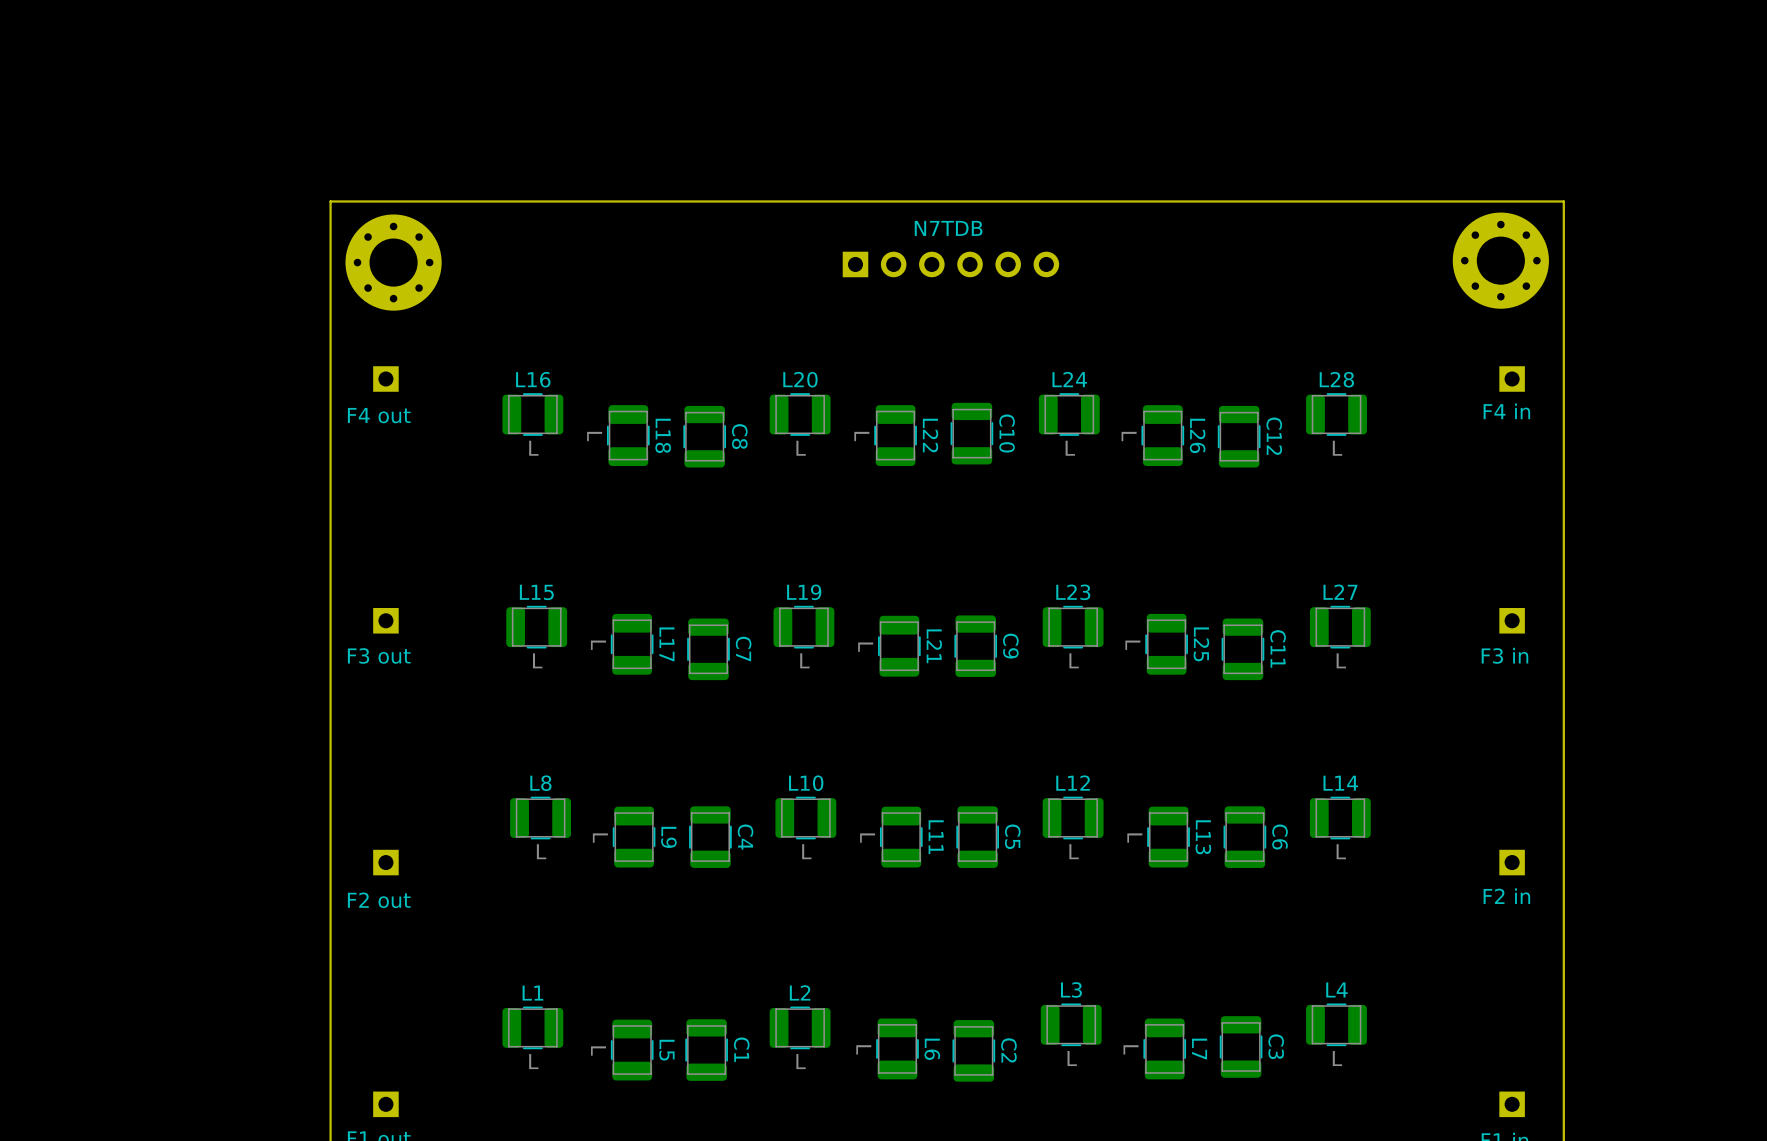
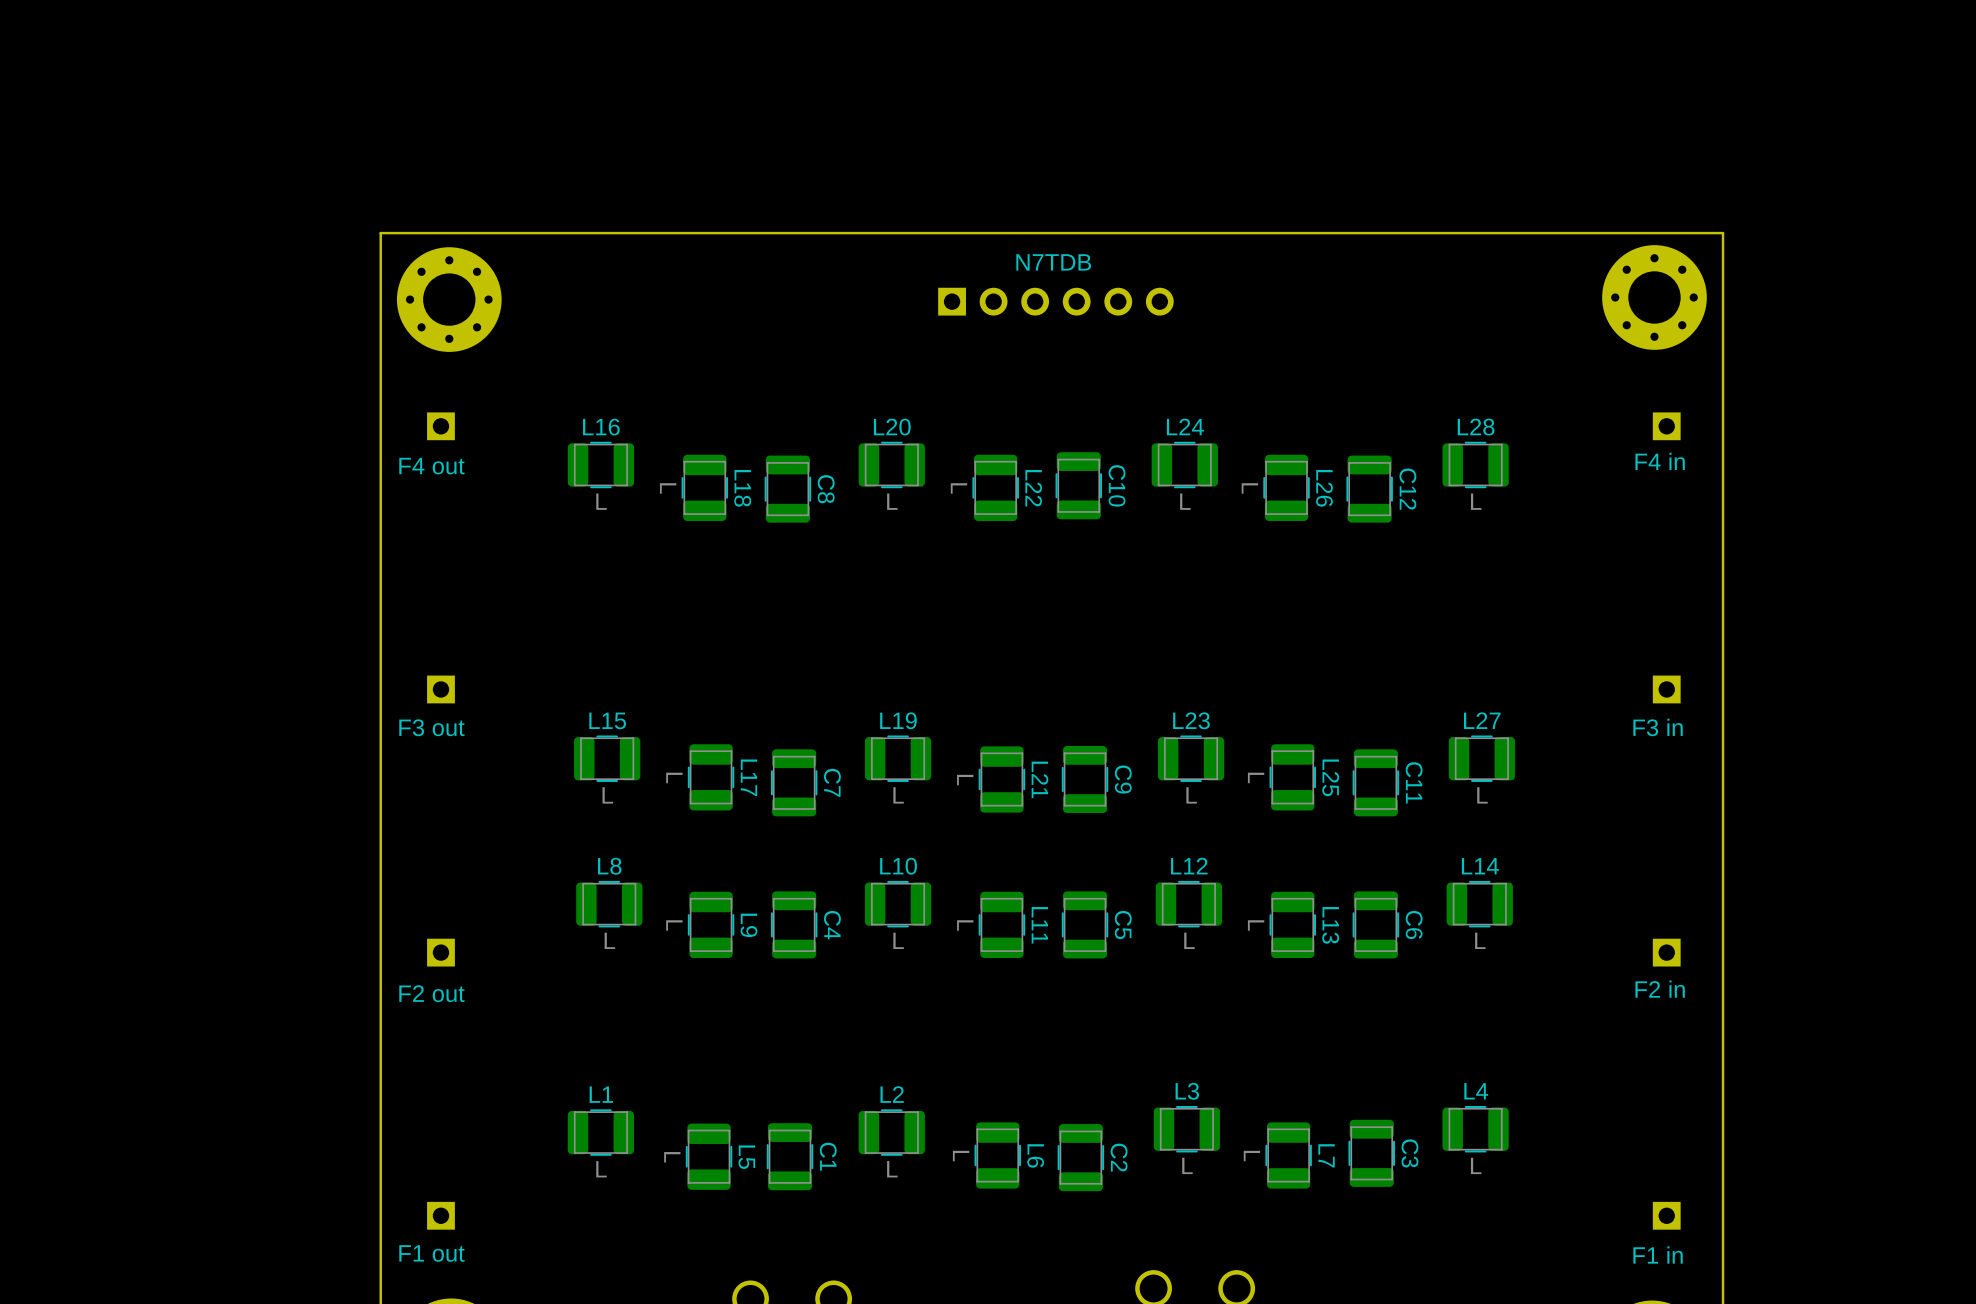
L15 position: (536, 627) -> (607, 758)
L19 position: (803, 627) -> (898, 758)
L23 position: (1073, 627) -> (1191, 758)
L27 position: (1340, 627) -> (1481, 758)
L17 position: (632, 644) -> (711, 777)
L25 position: (1166, 644) -> (1292, 777)
L21 position: (899, 646) -> (1001, 779)
C9 position: (975, 646) -> (1085, 779)
C7 position: (708, 649) -> (794, 782)
C11 position: (1242, 649) -> (1375, 782)

